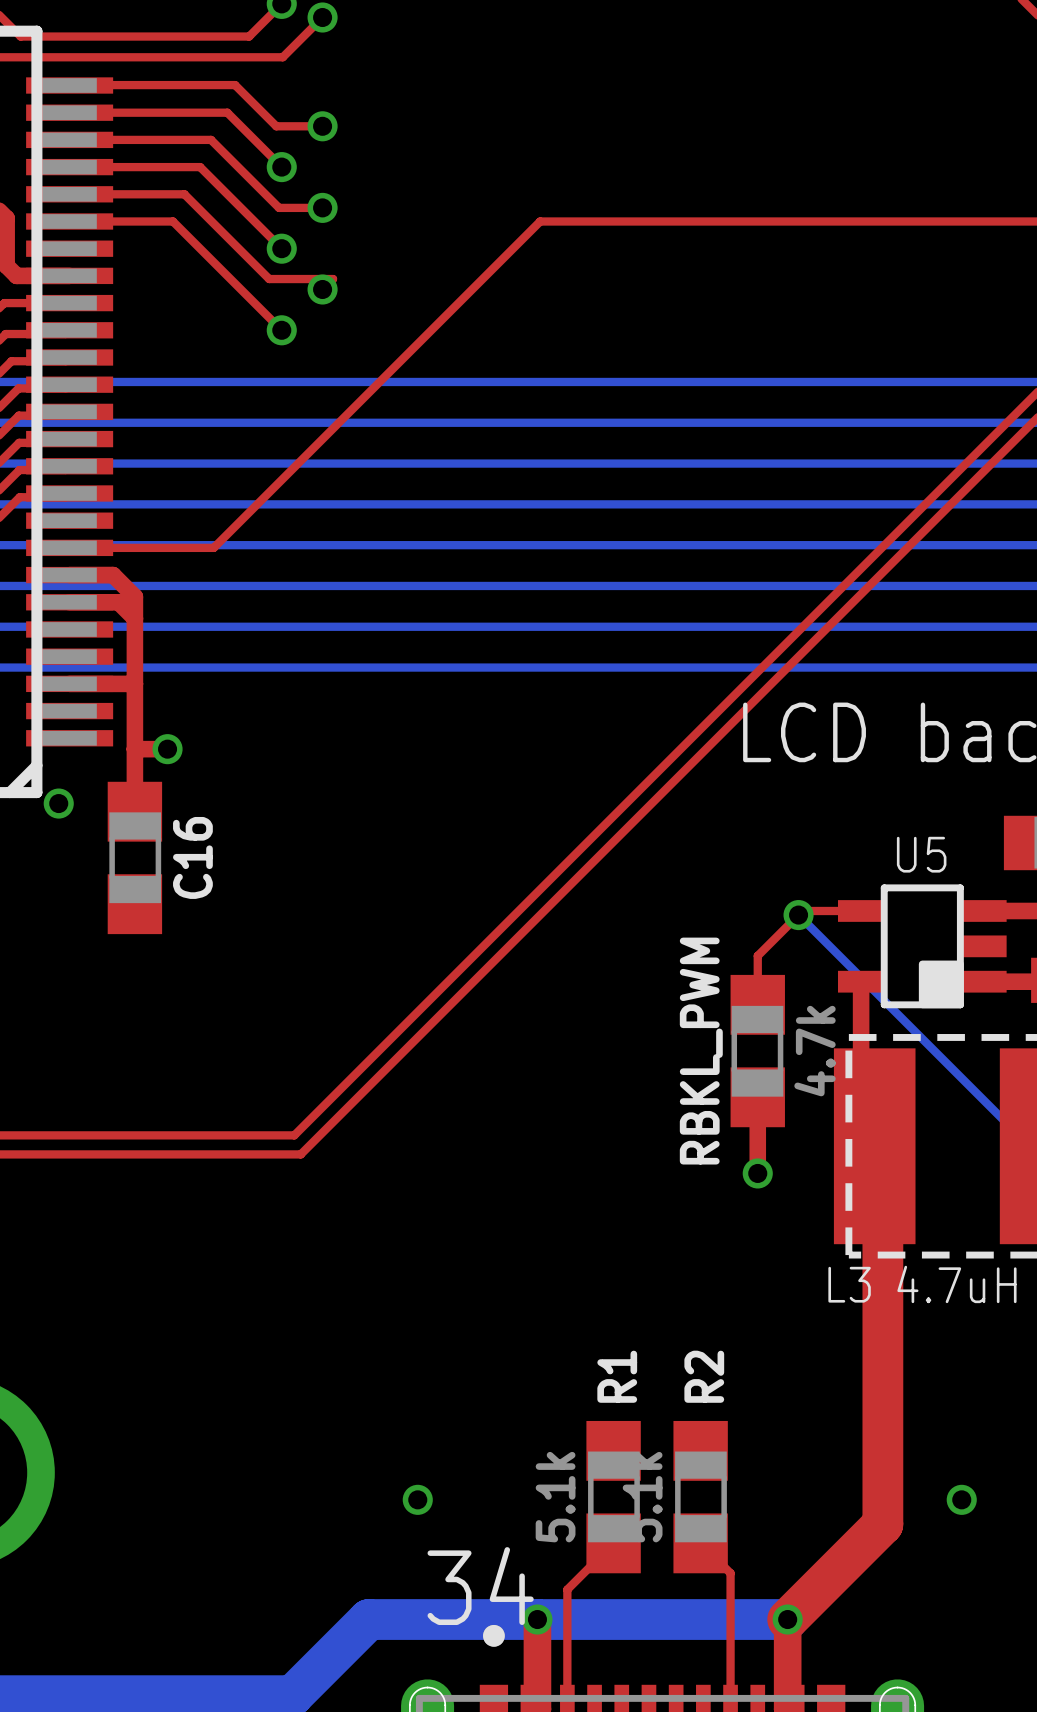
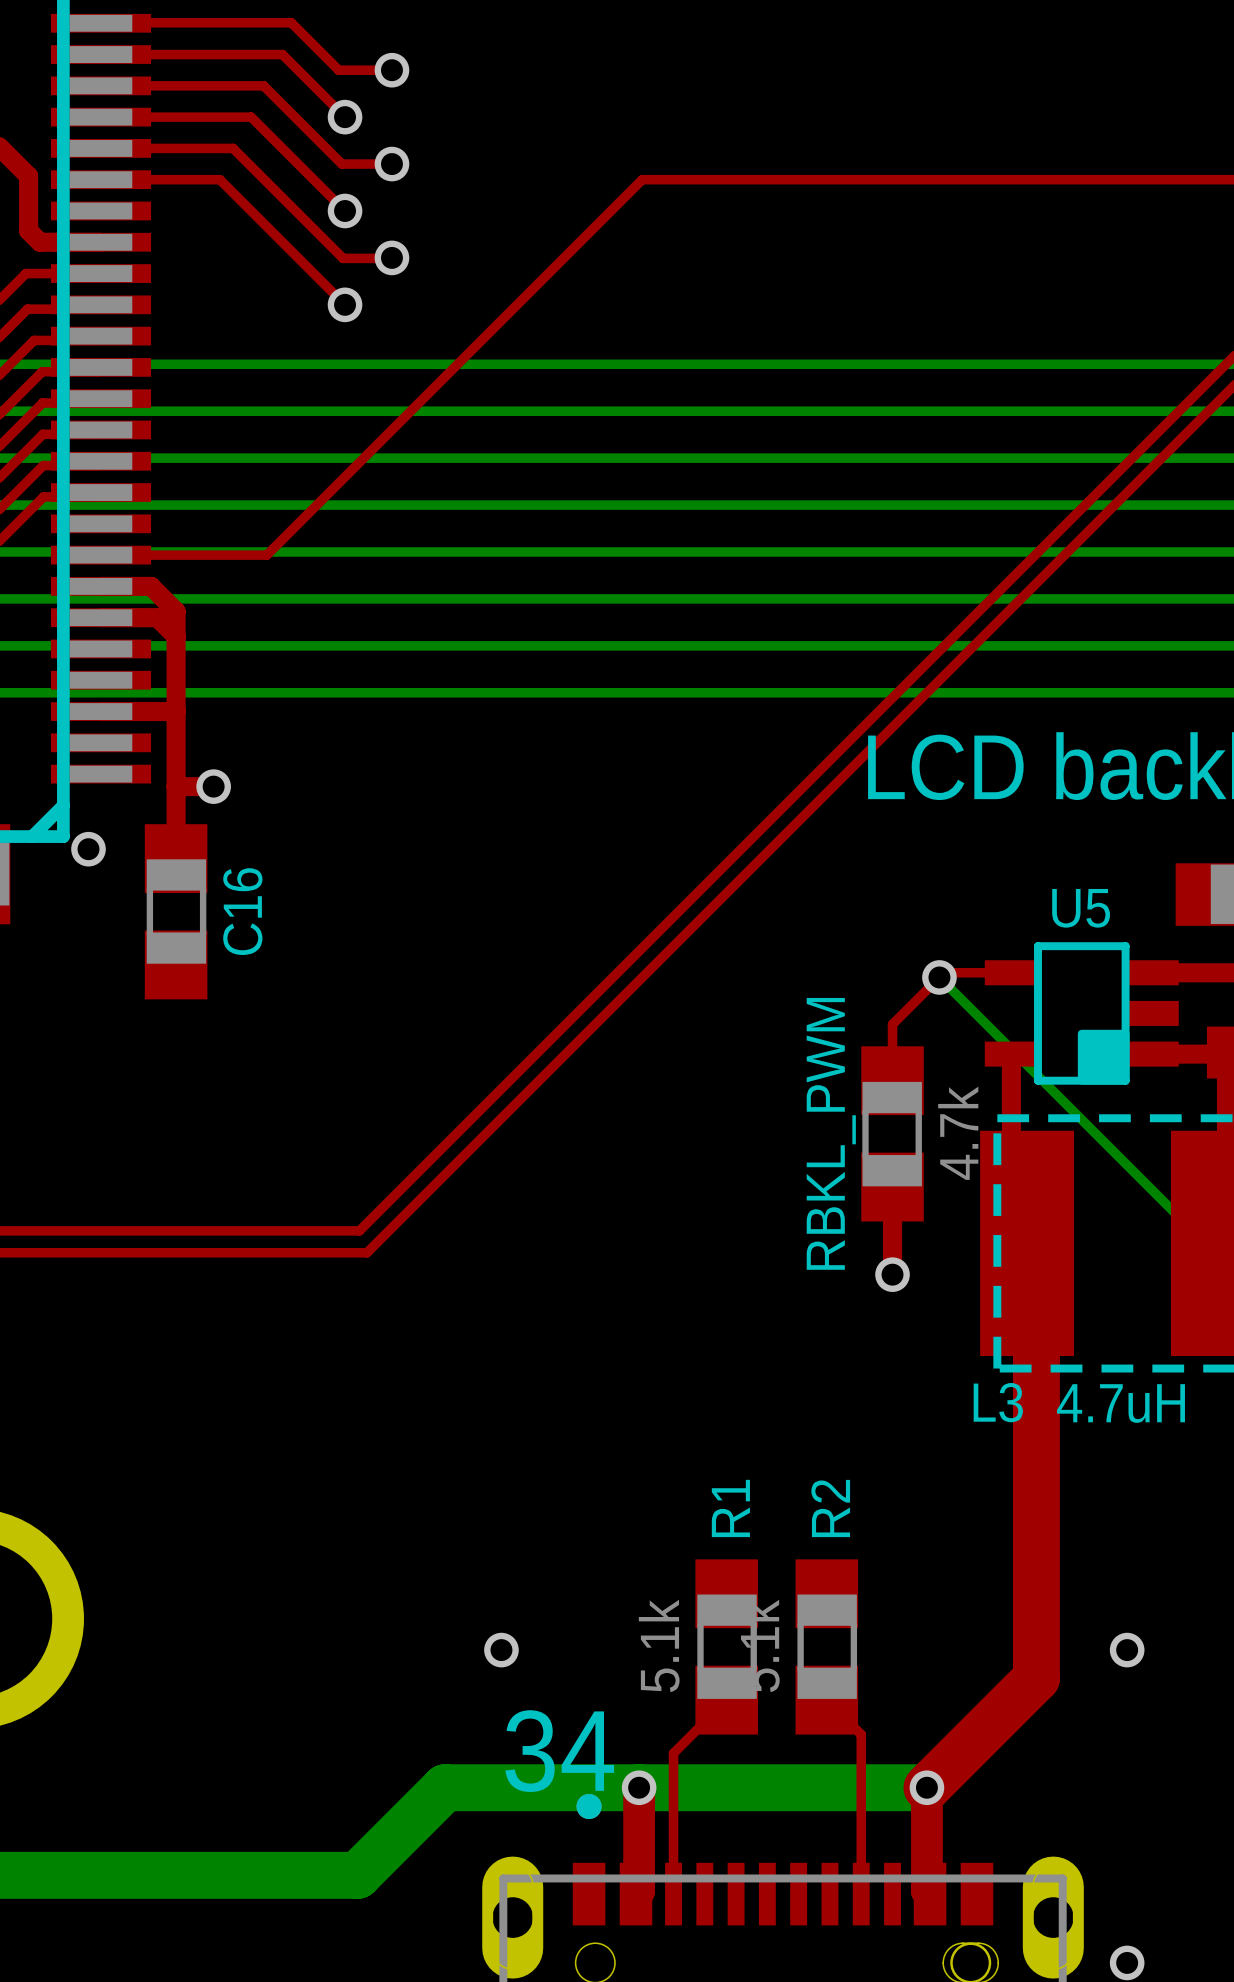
top track: (269, 279) (333, 279) (322, 289) -> (330, 245) (343, 258) (391, 258)

